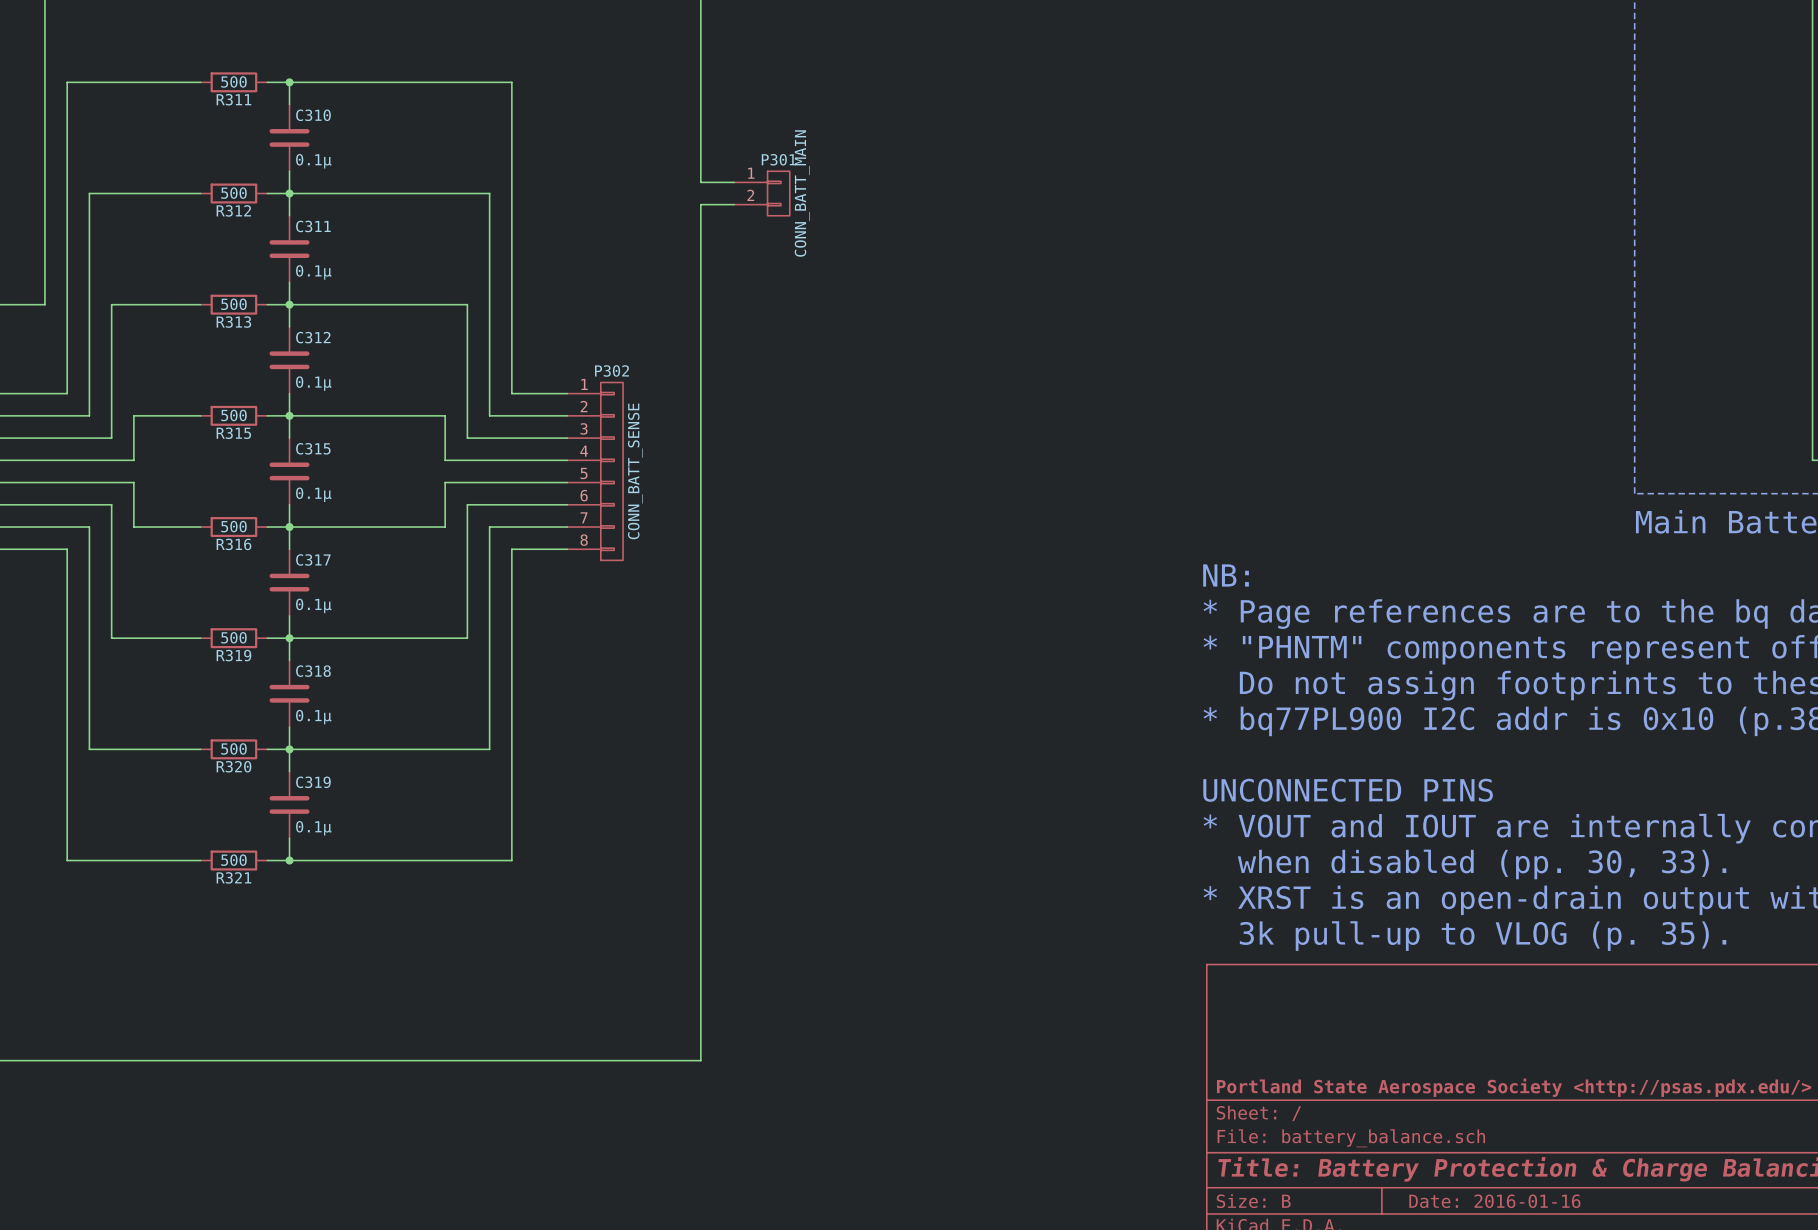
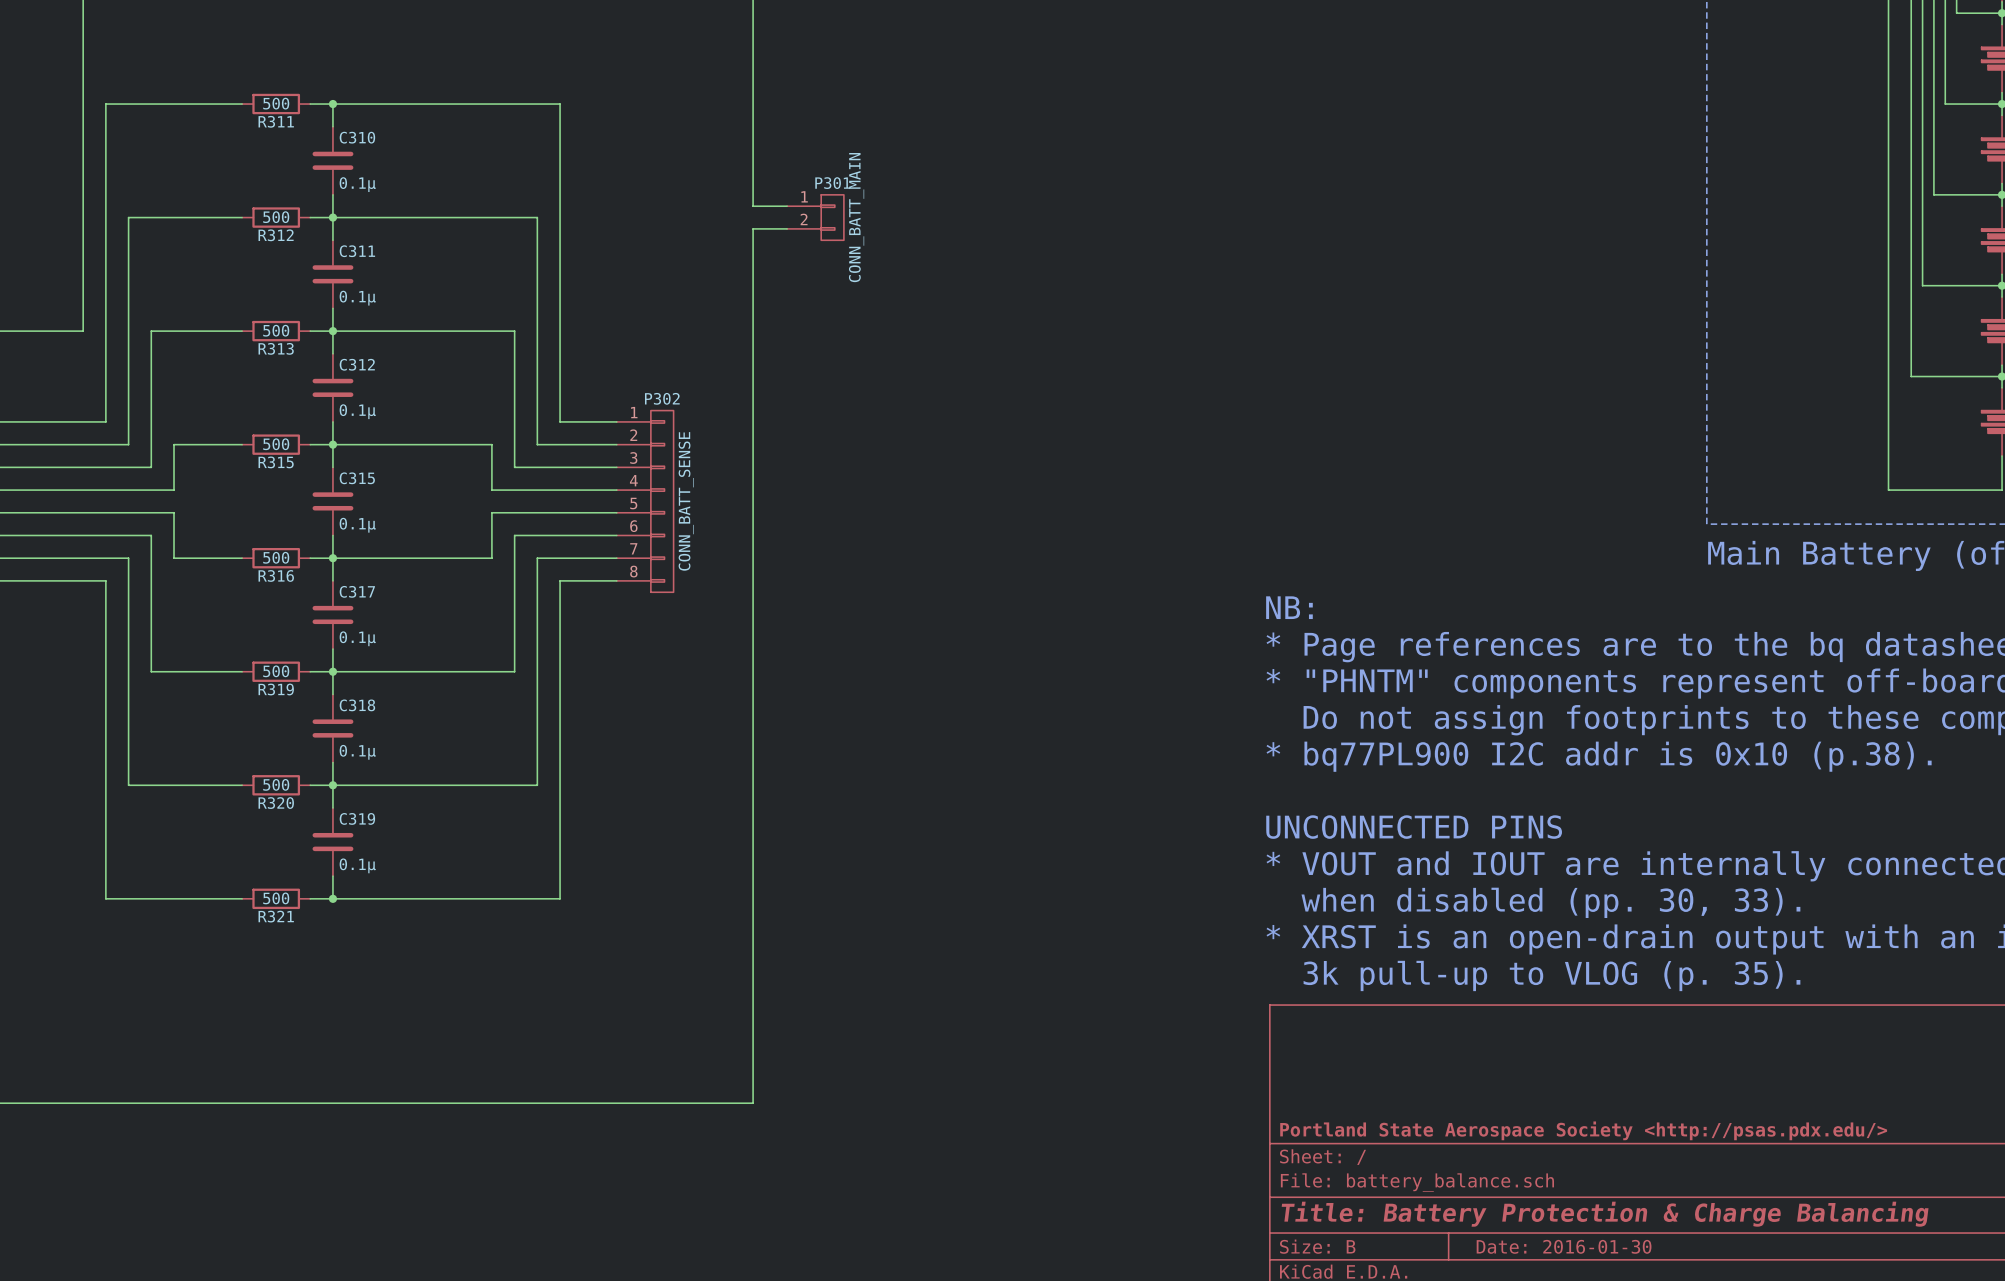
title block: Date: 2016-01-16 (1494, 1201) -> Date: 2016-01-30 (1564, 1246)

